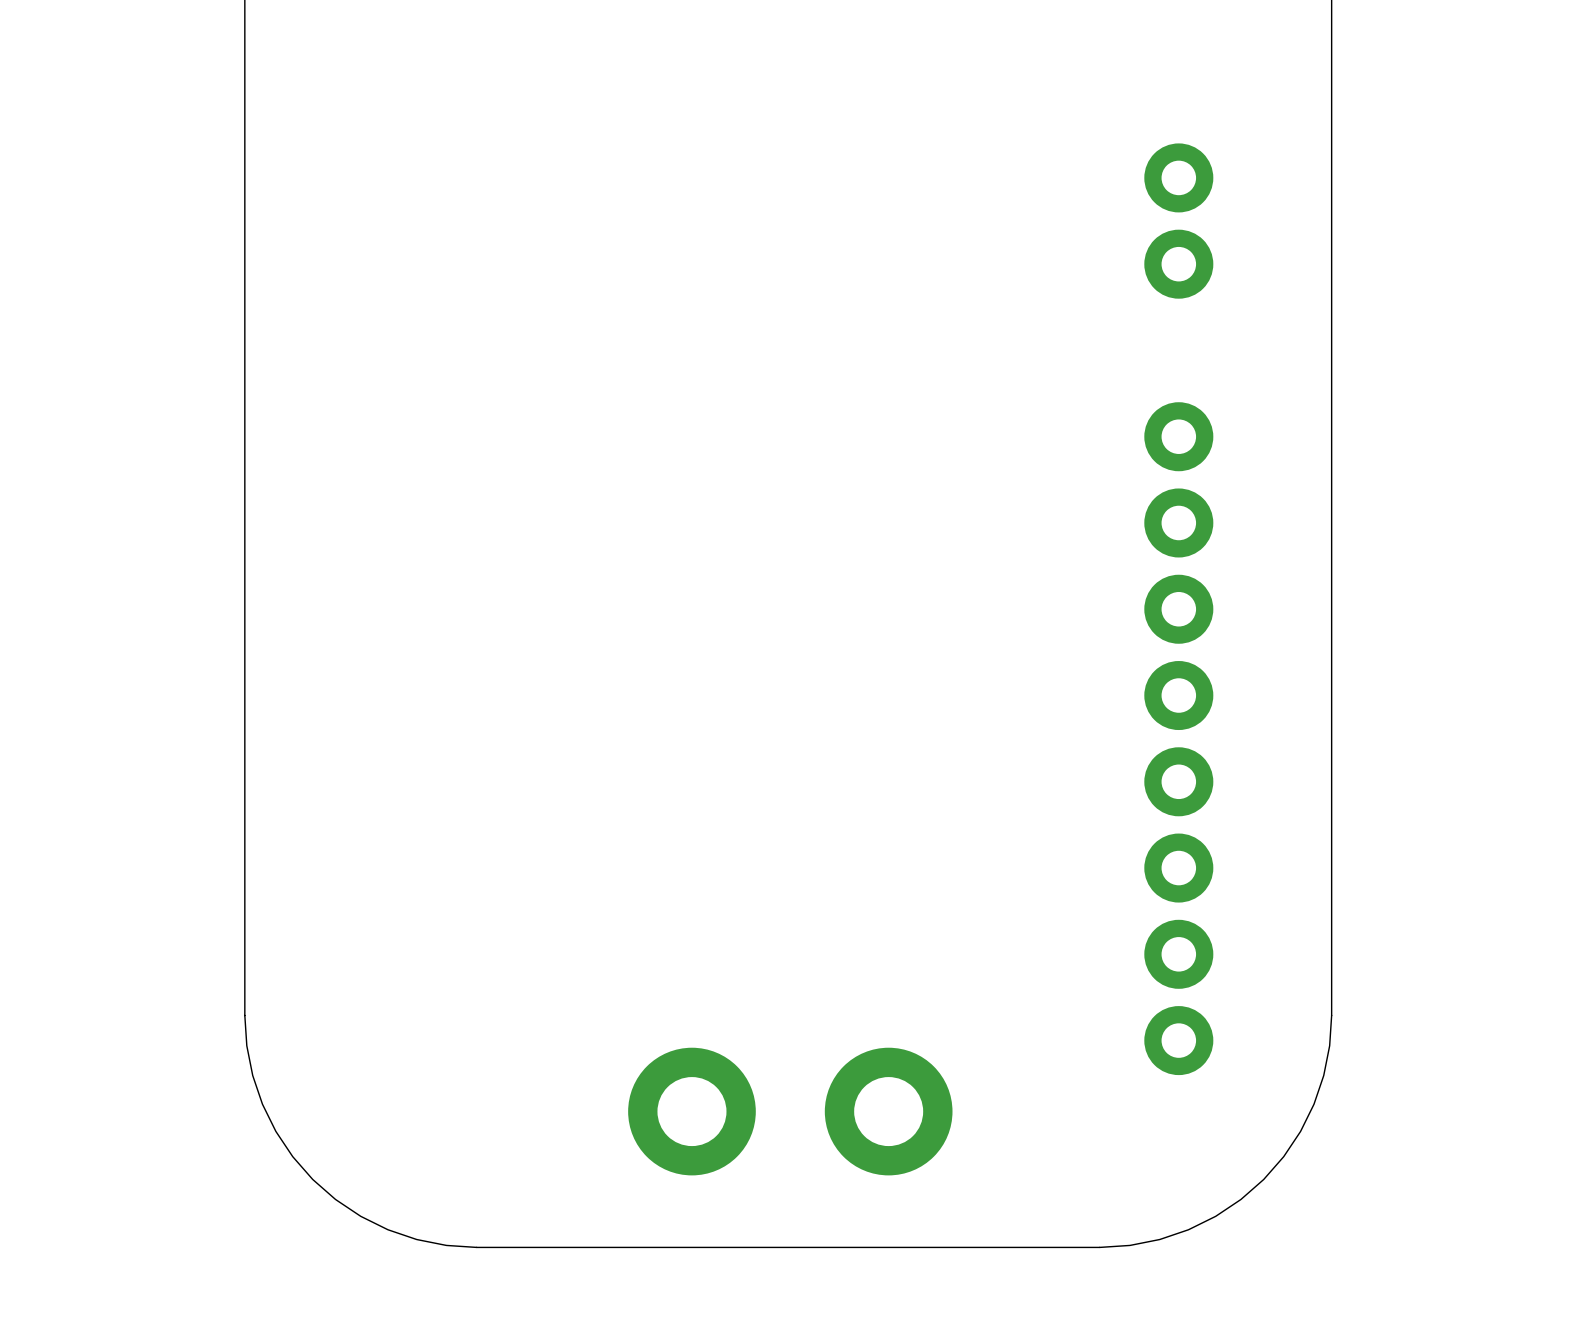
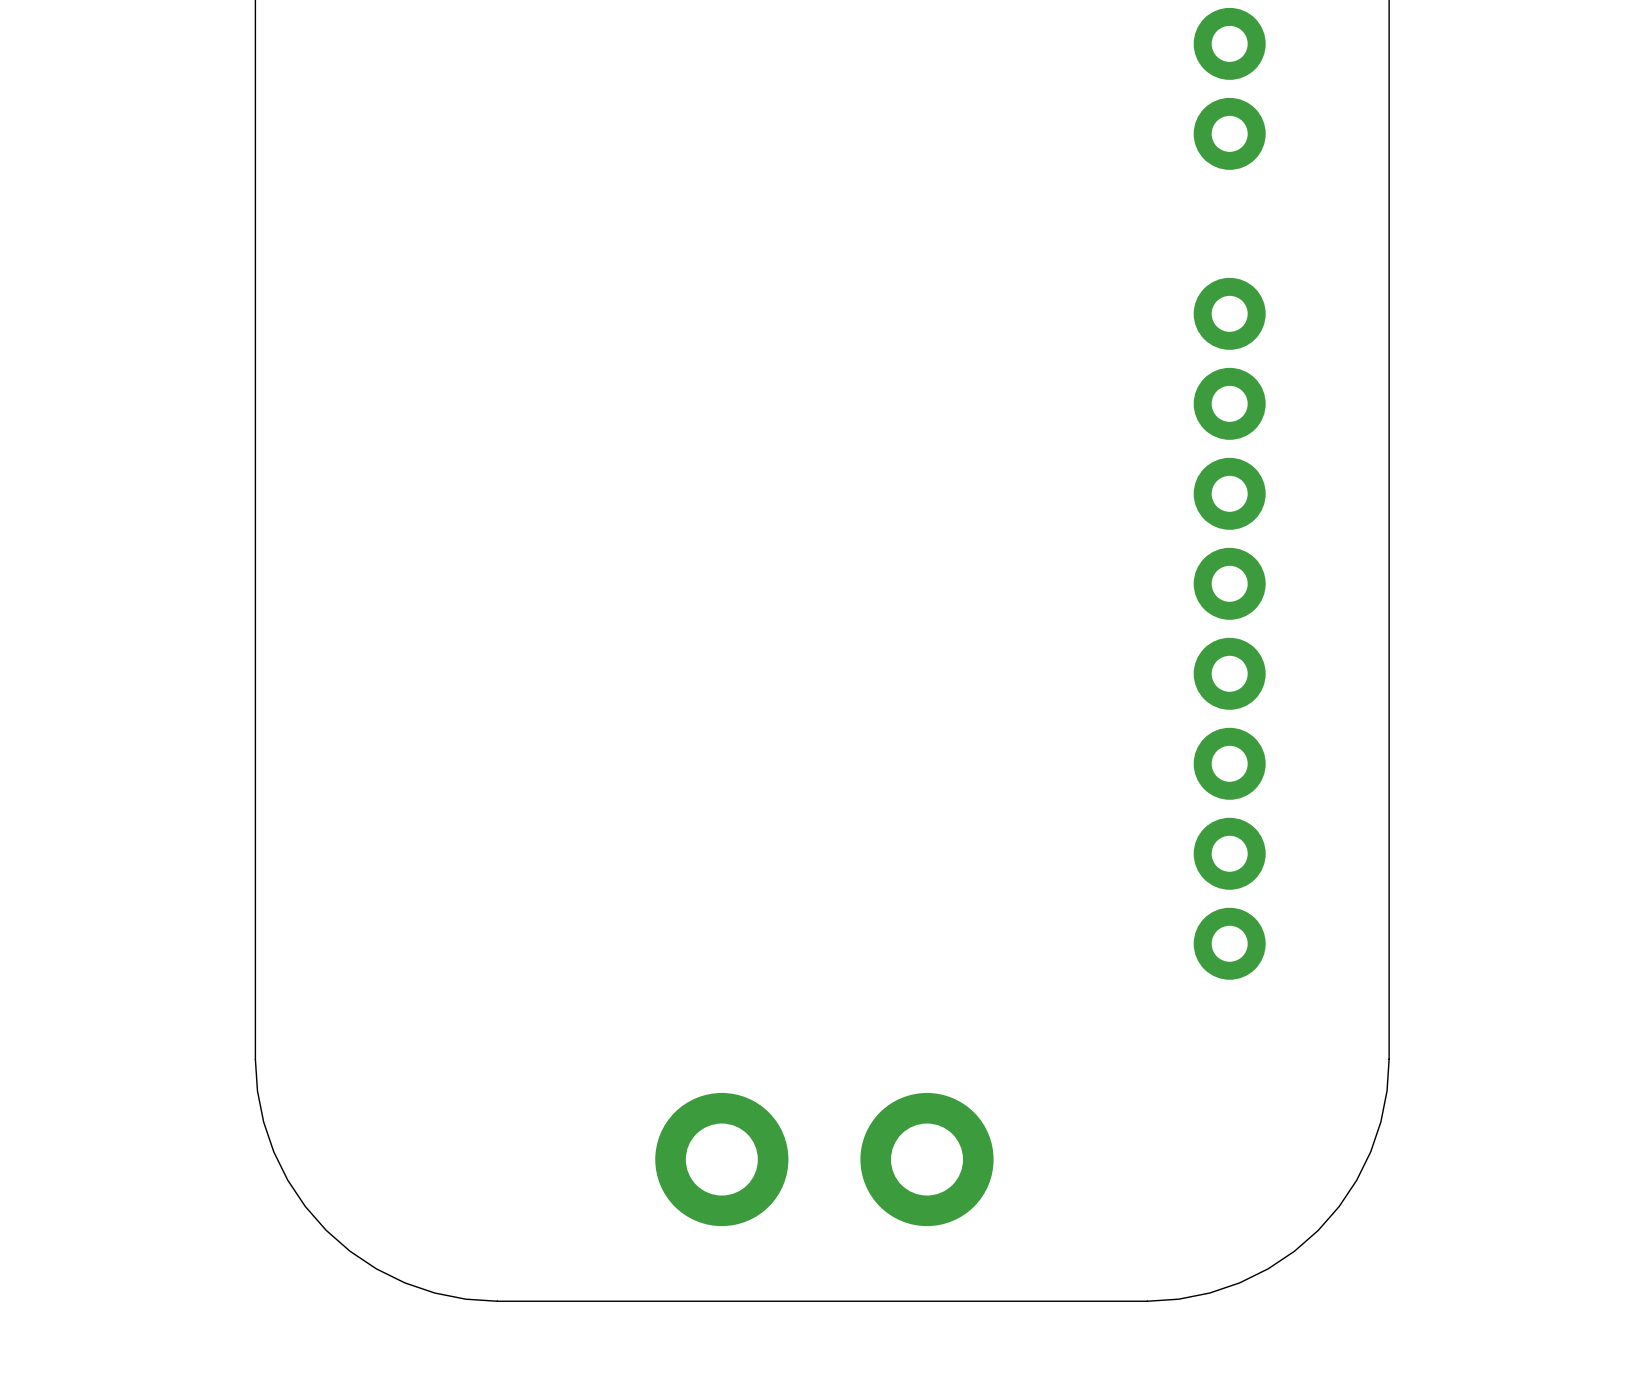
part position: (1178, 221) -> (1229, 88)
part position: (1178, 609) -> (1229, 493)
part position: (1178, 954) -> (1229, 853)

